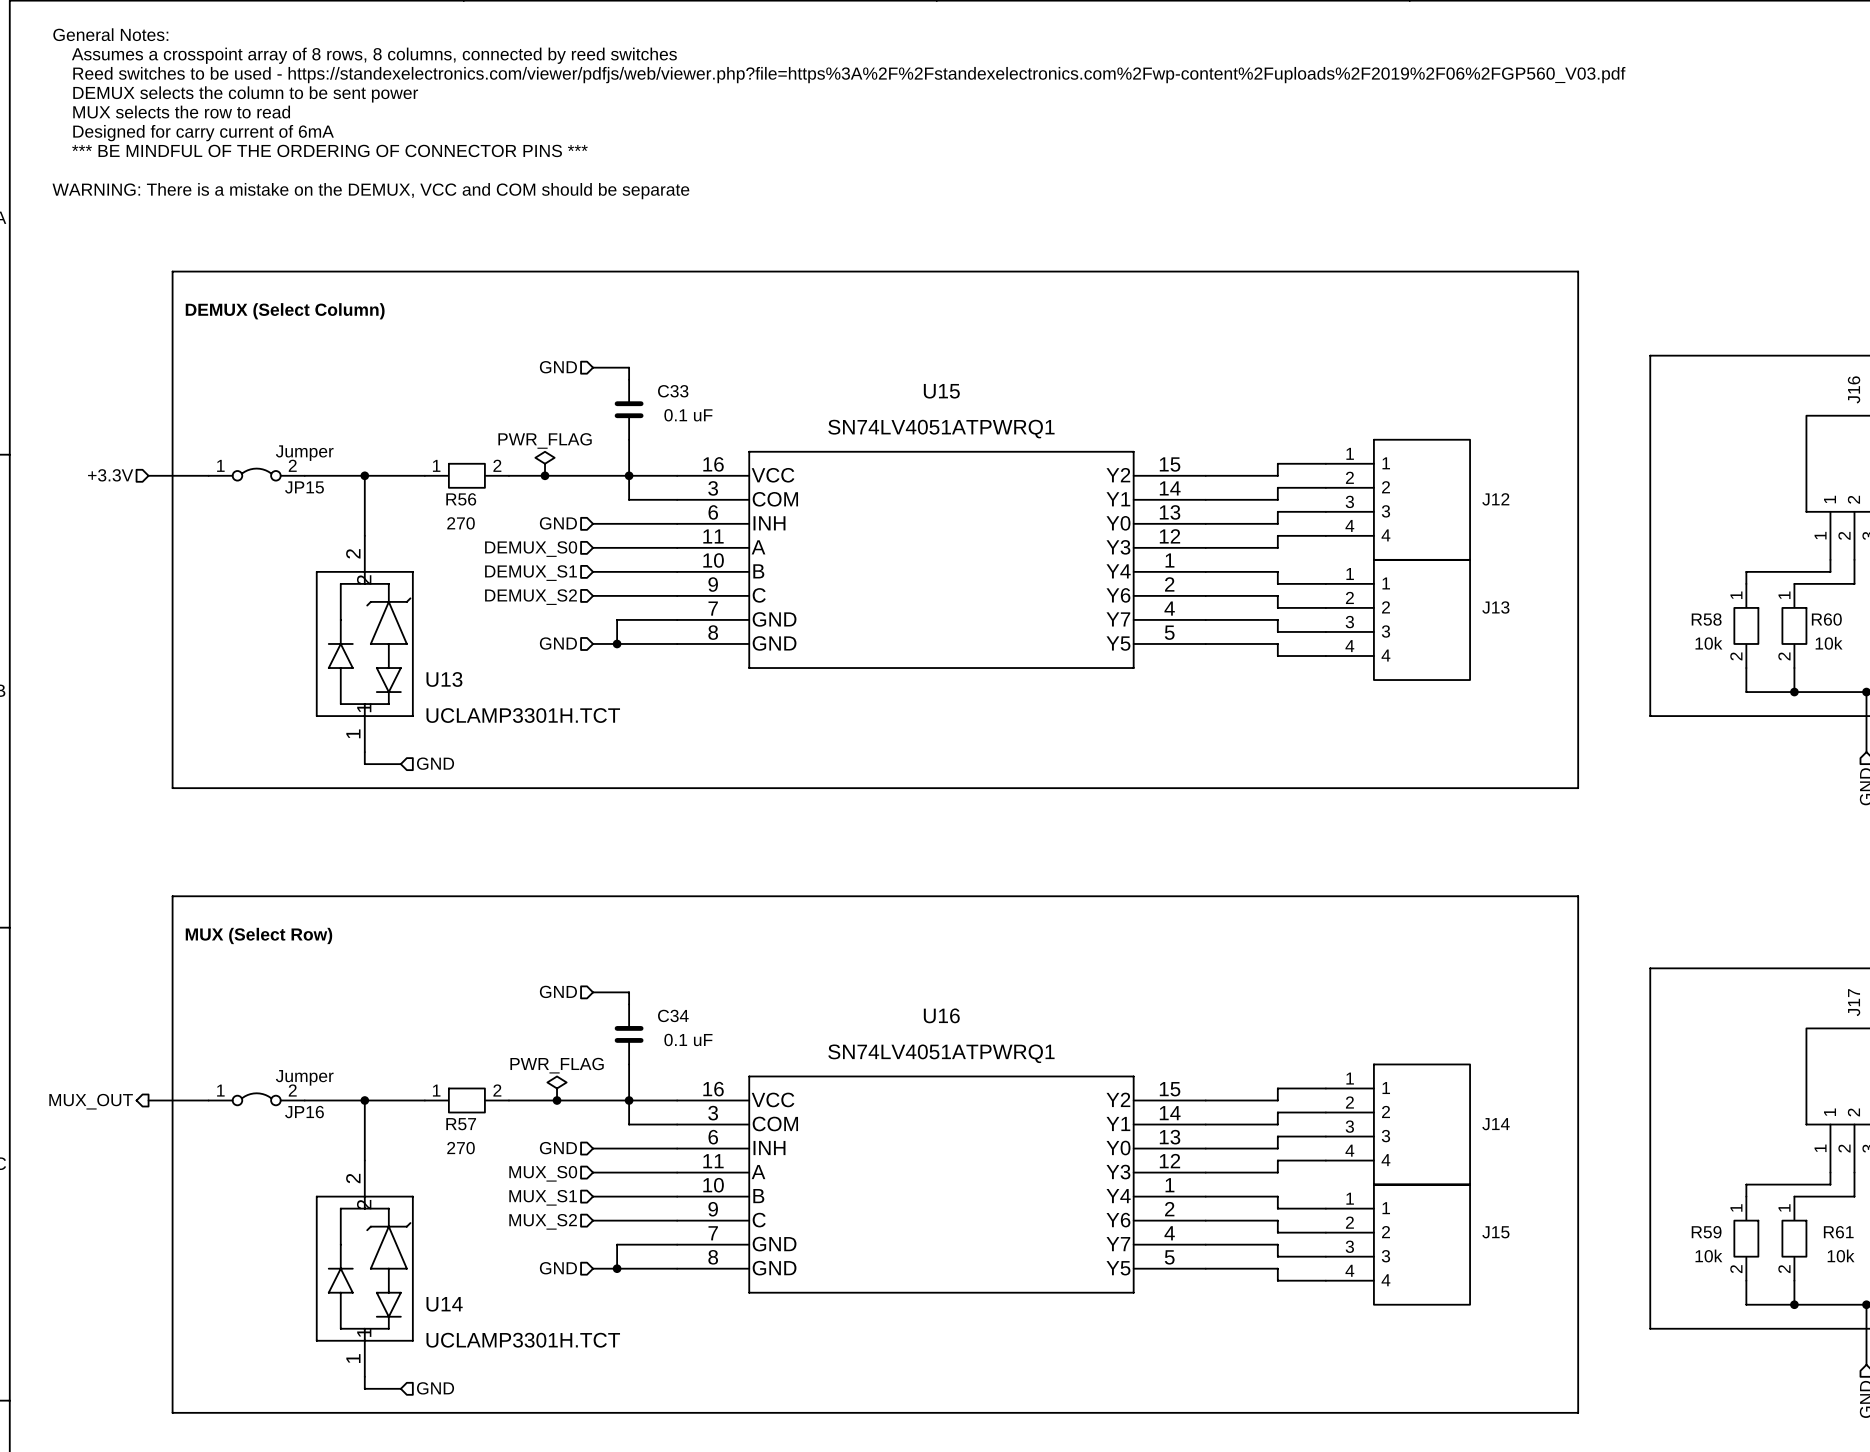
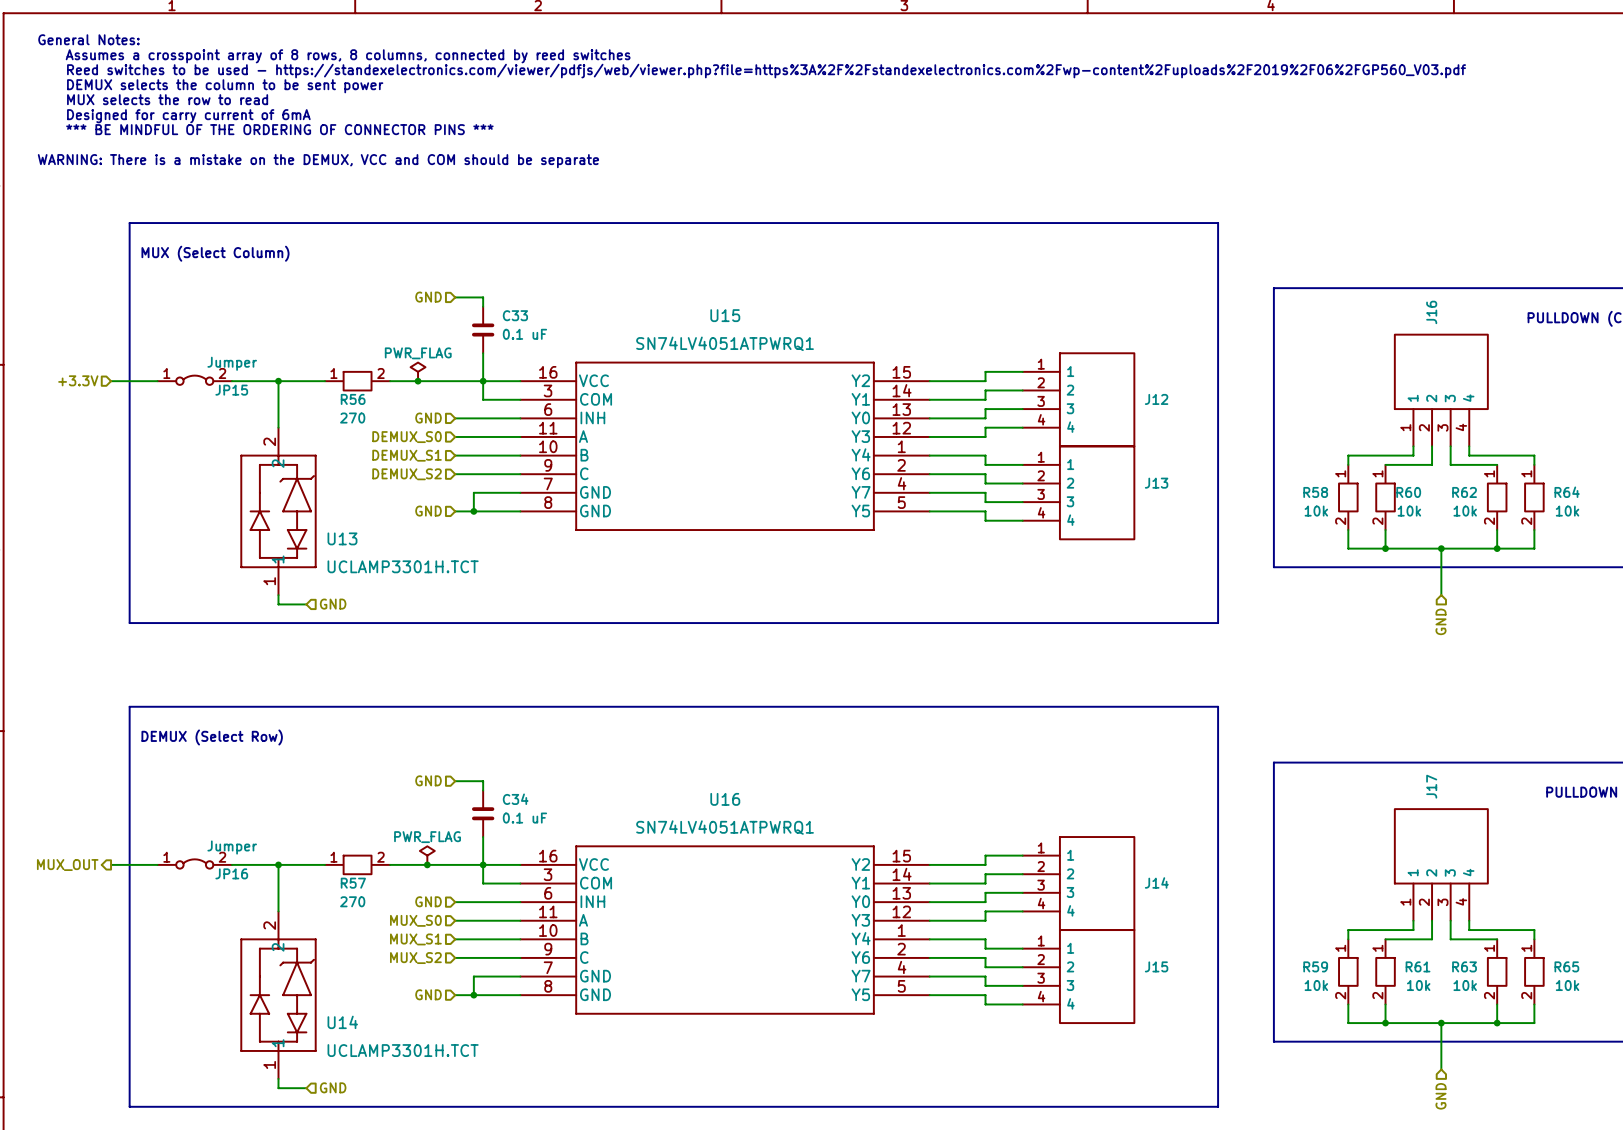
text: DEMUX (Select Column) (285, 311) -> MUX (Select Column) (215, 253)
text: MUX (Select Row) (258, 935) -> DEMUX (Select Row) (212, 737)

